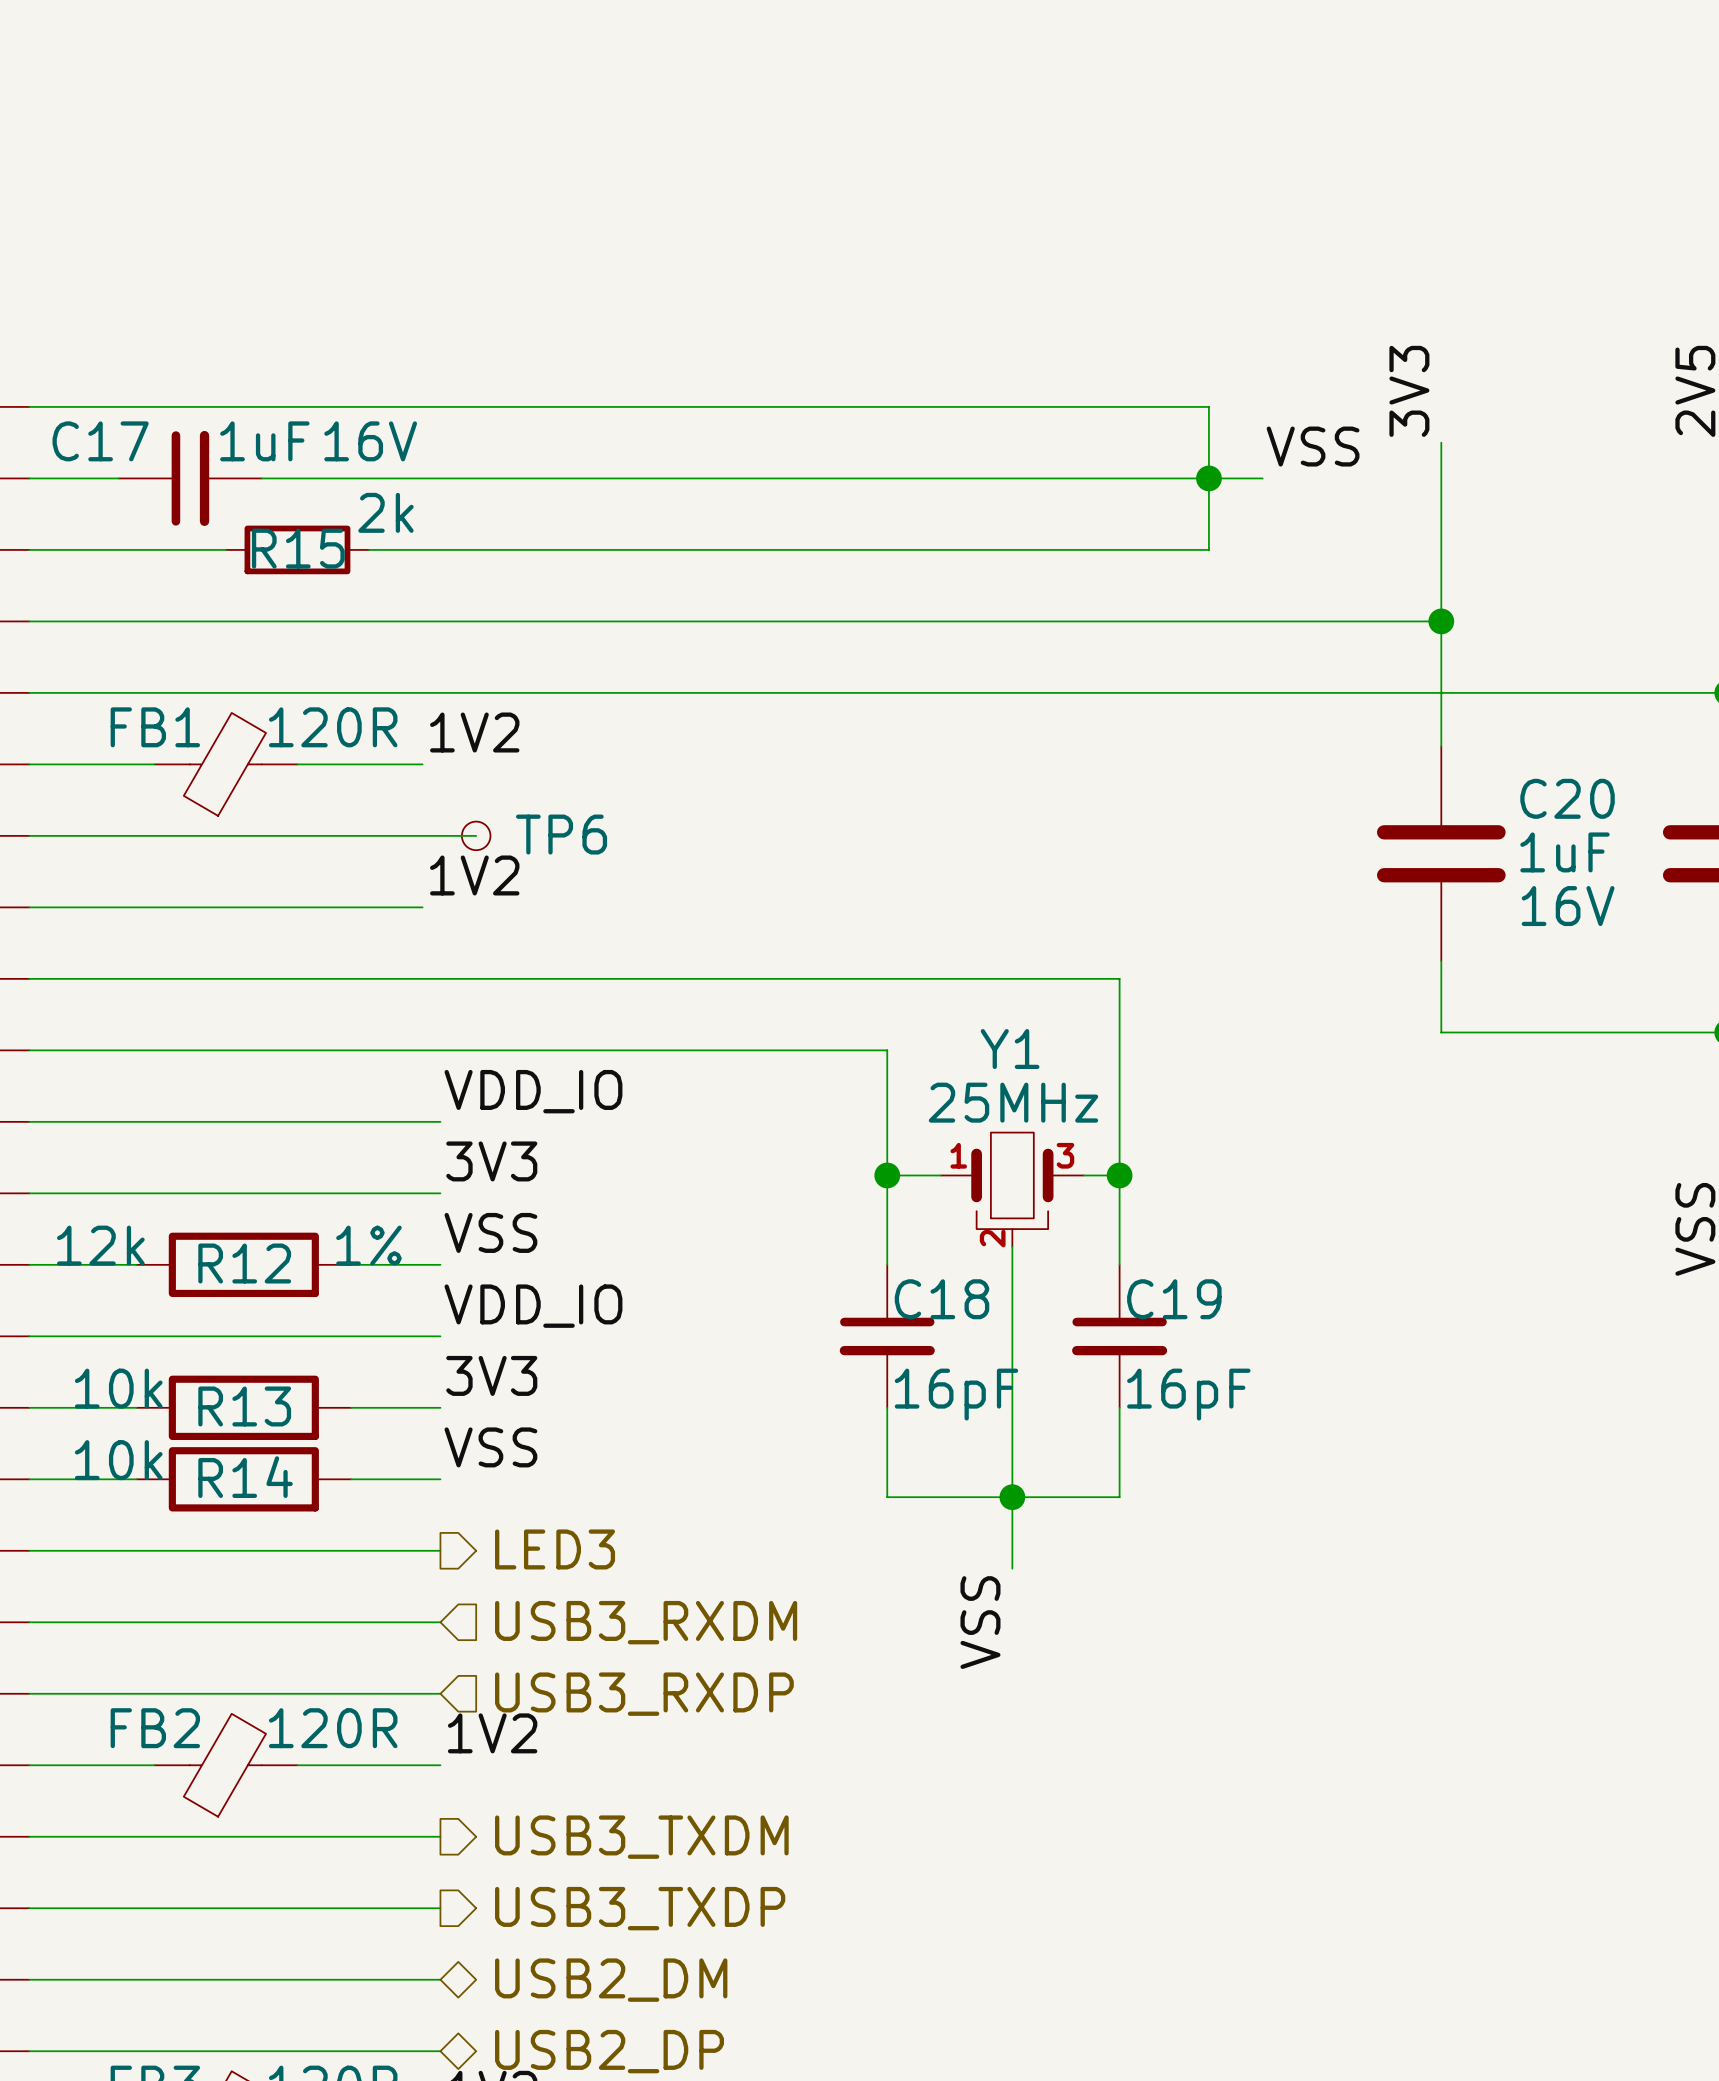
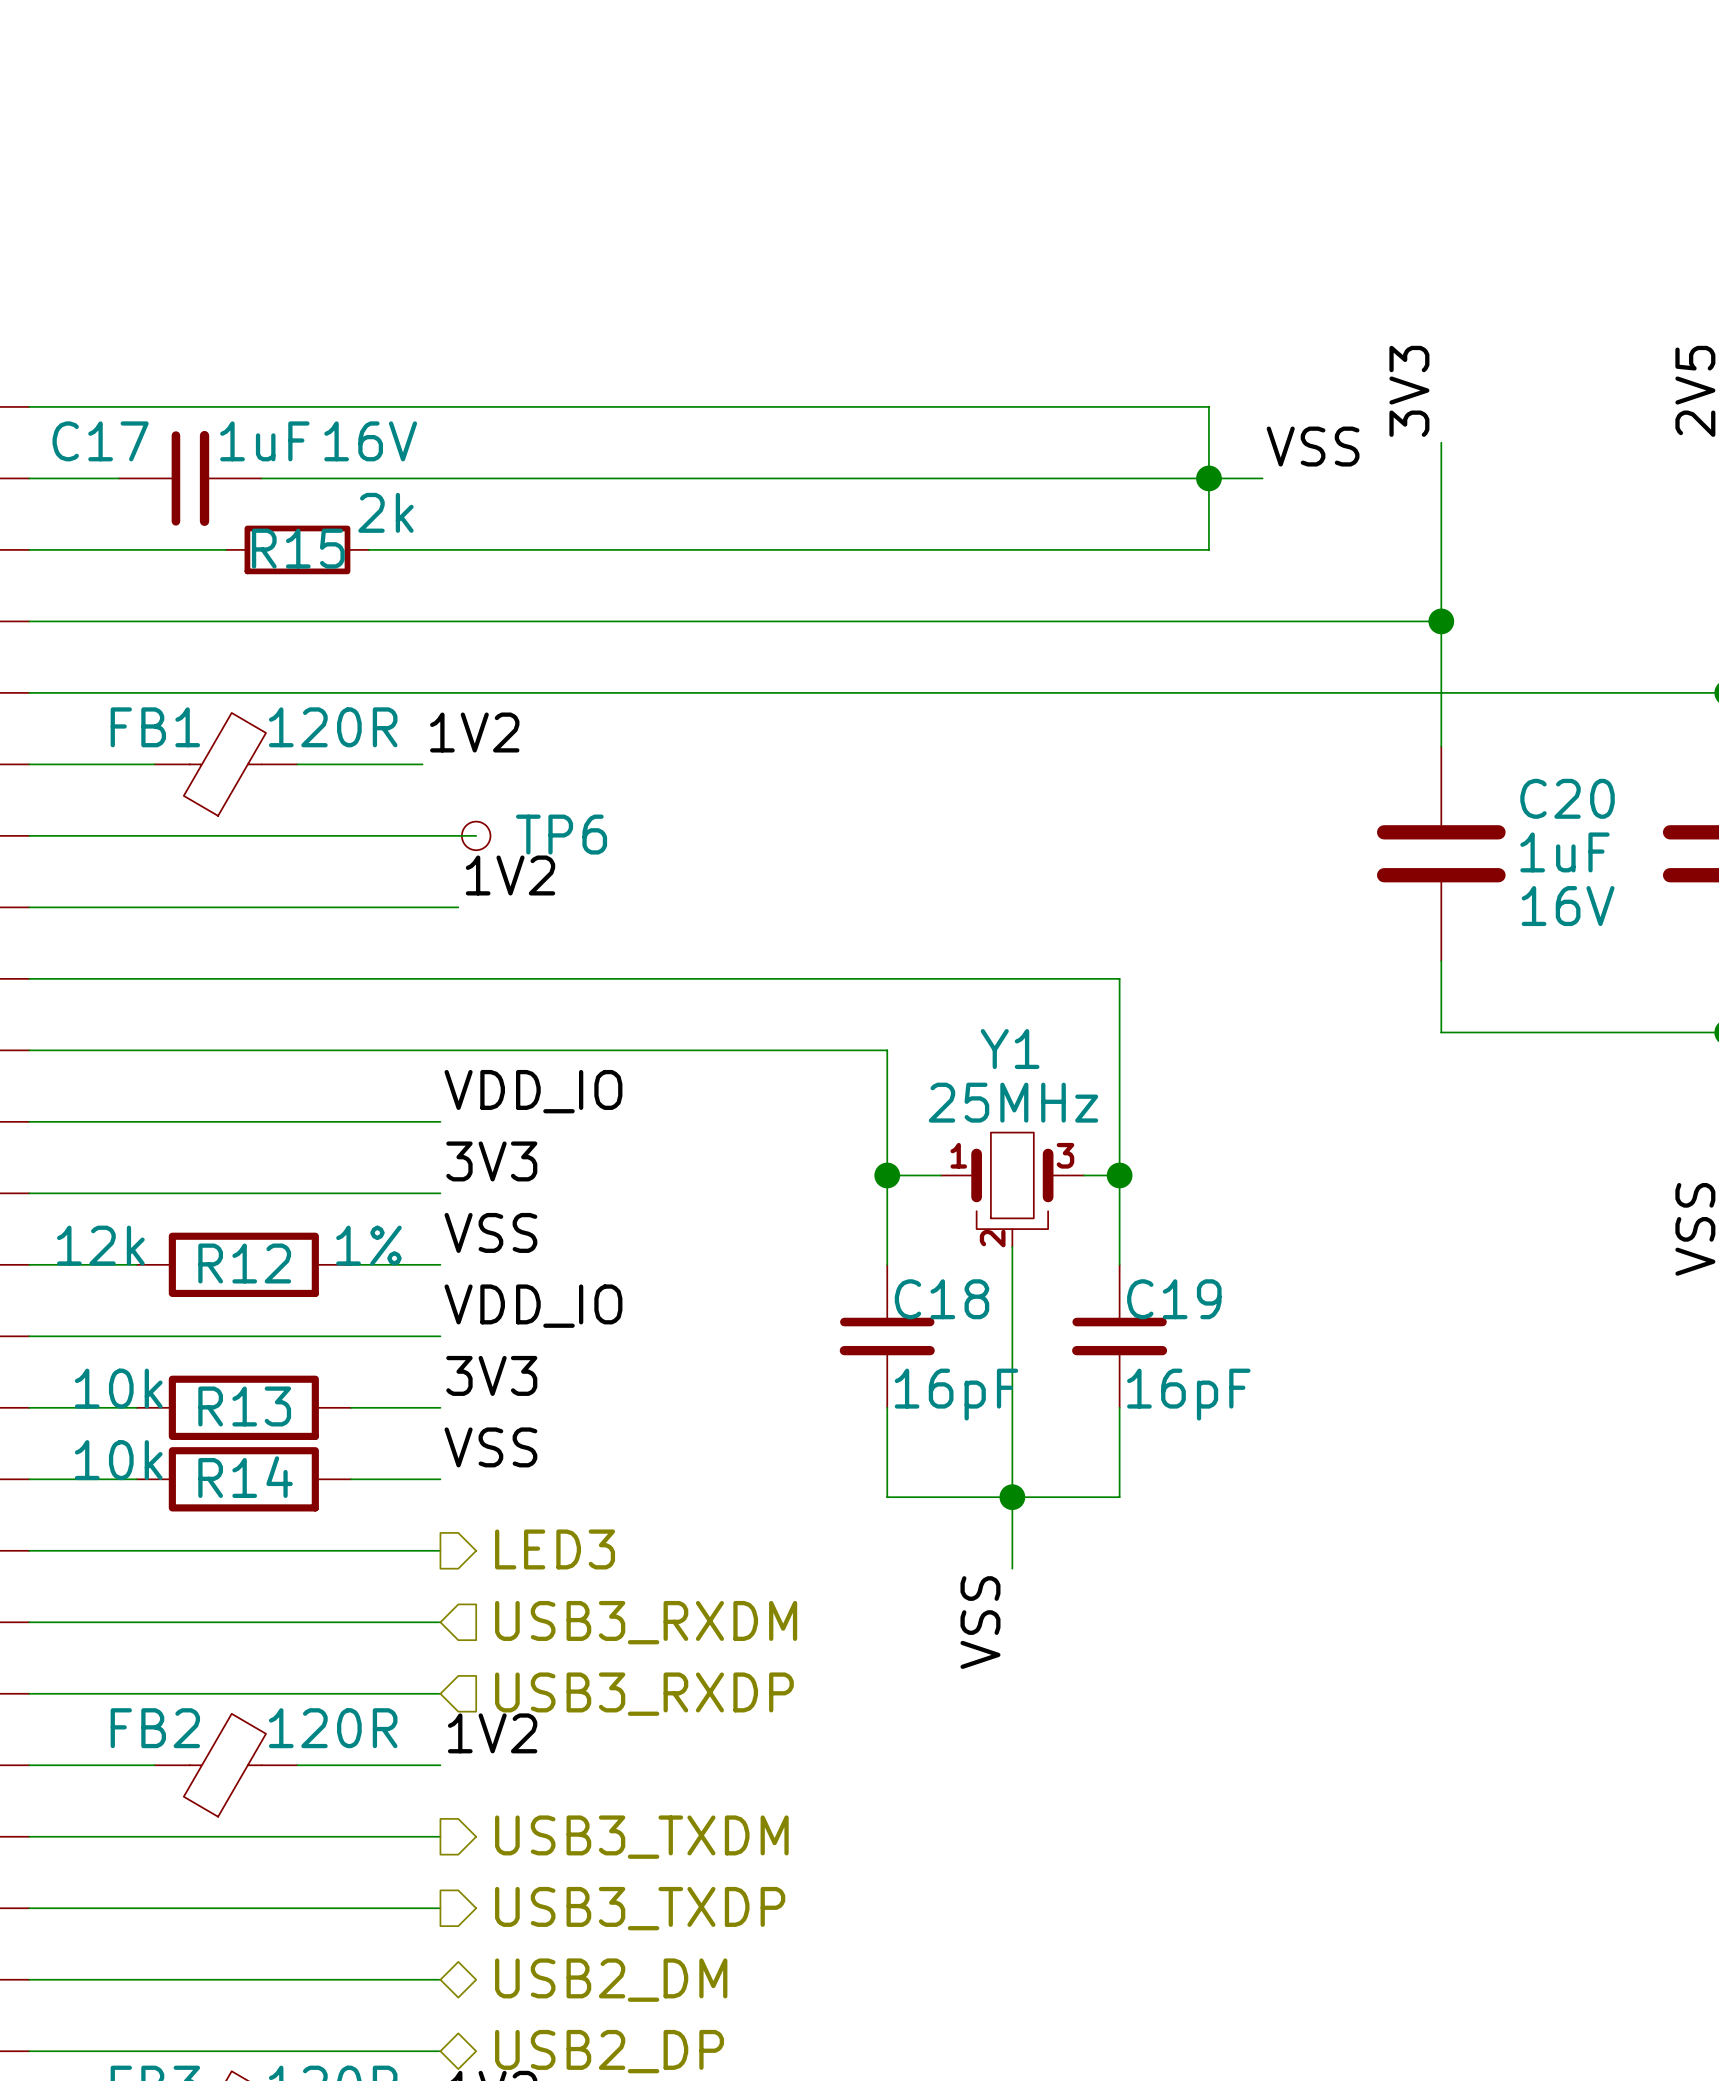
label position: 1V2 (474, 875) -> 1V2 (510, 875)
wire: none -> (422, 907) (458, 907)

